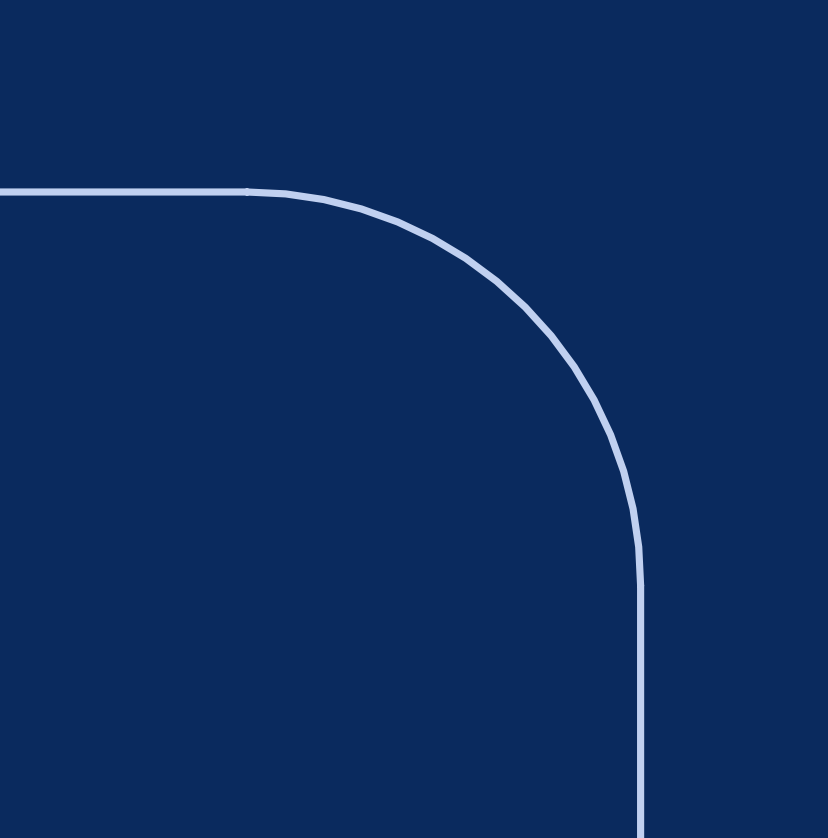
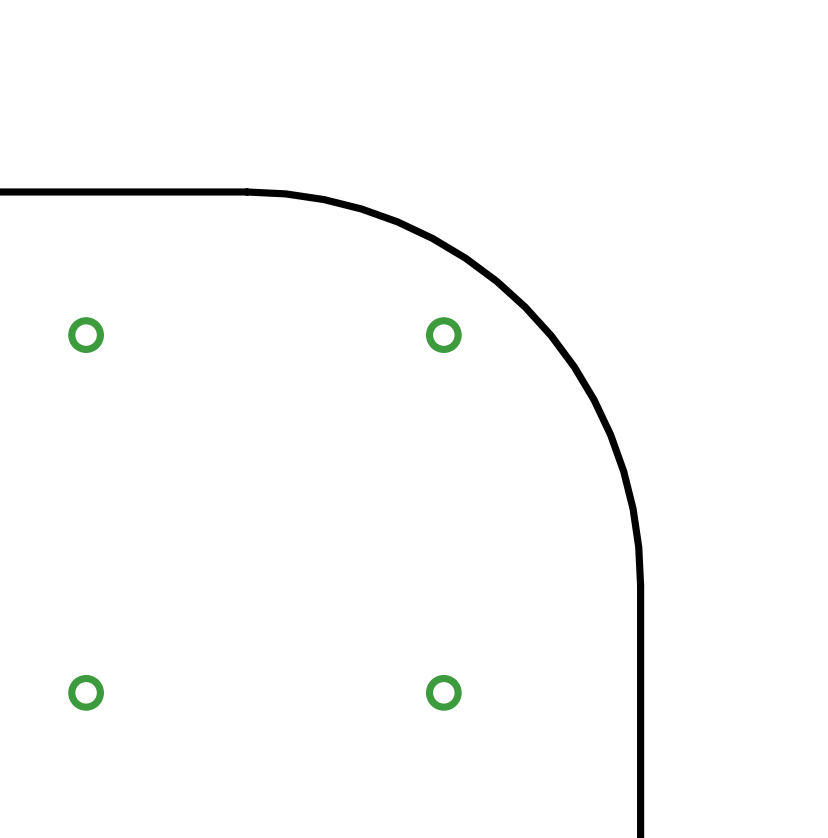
via: none -> (86, 335)
via: none -> (443, 335)
via: none -> (86, 692)
via: none -> (443, 692)

